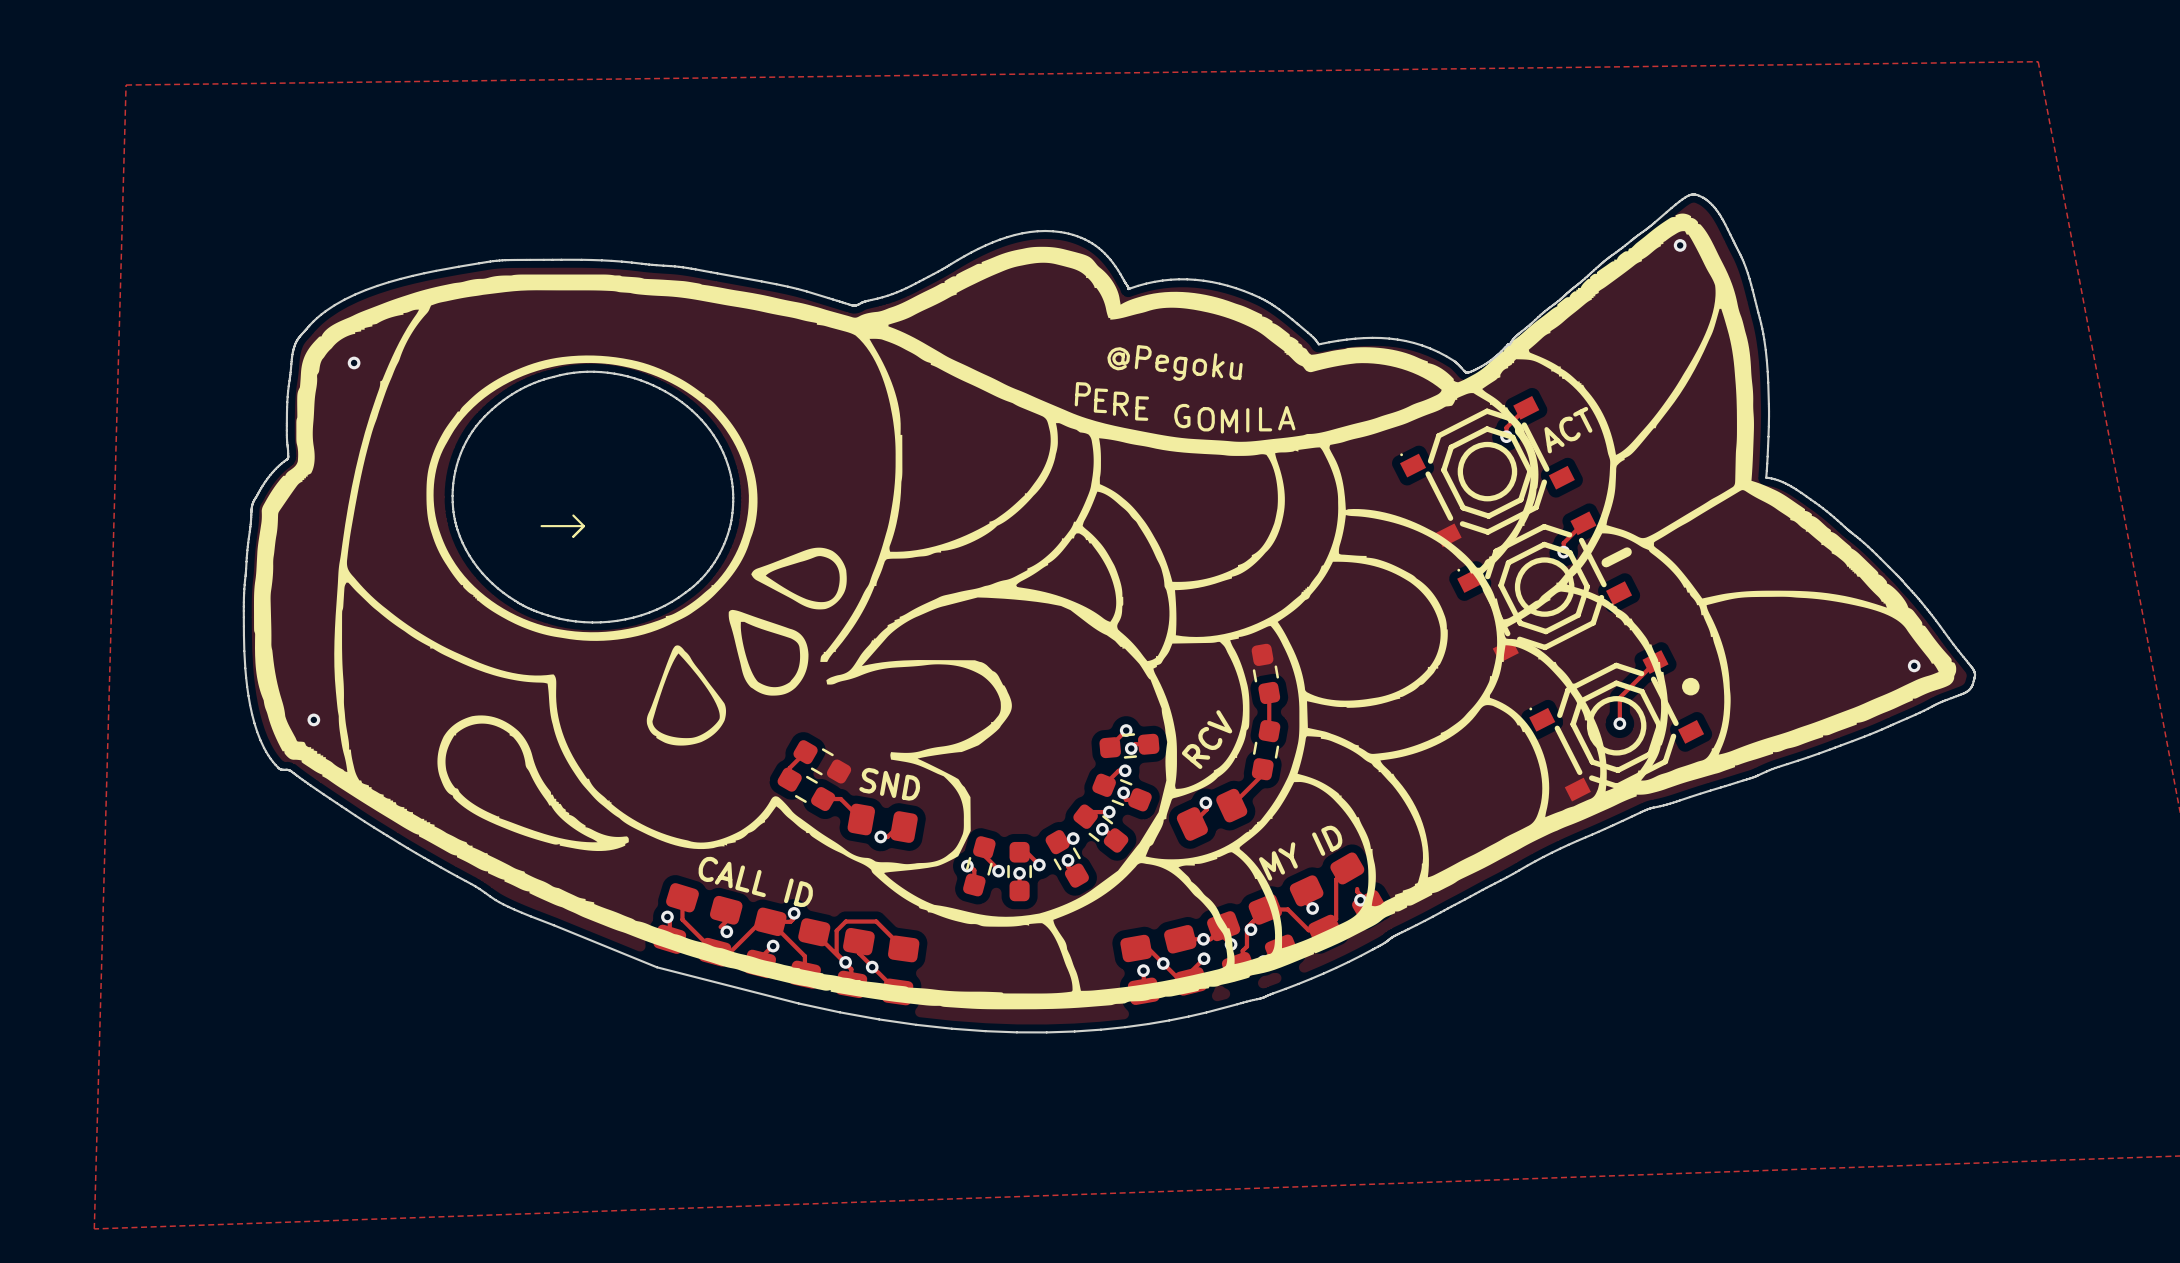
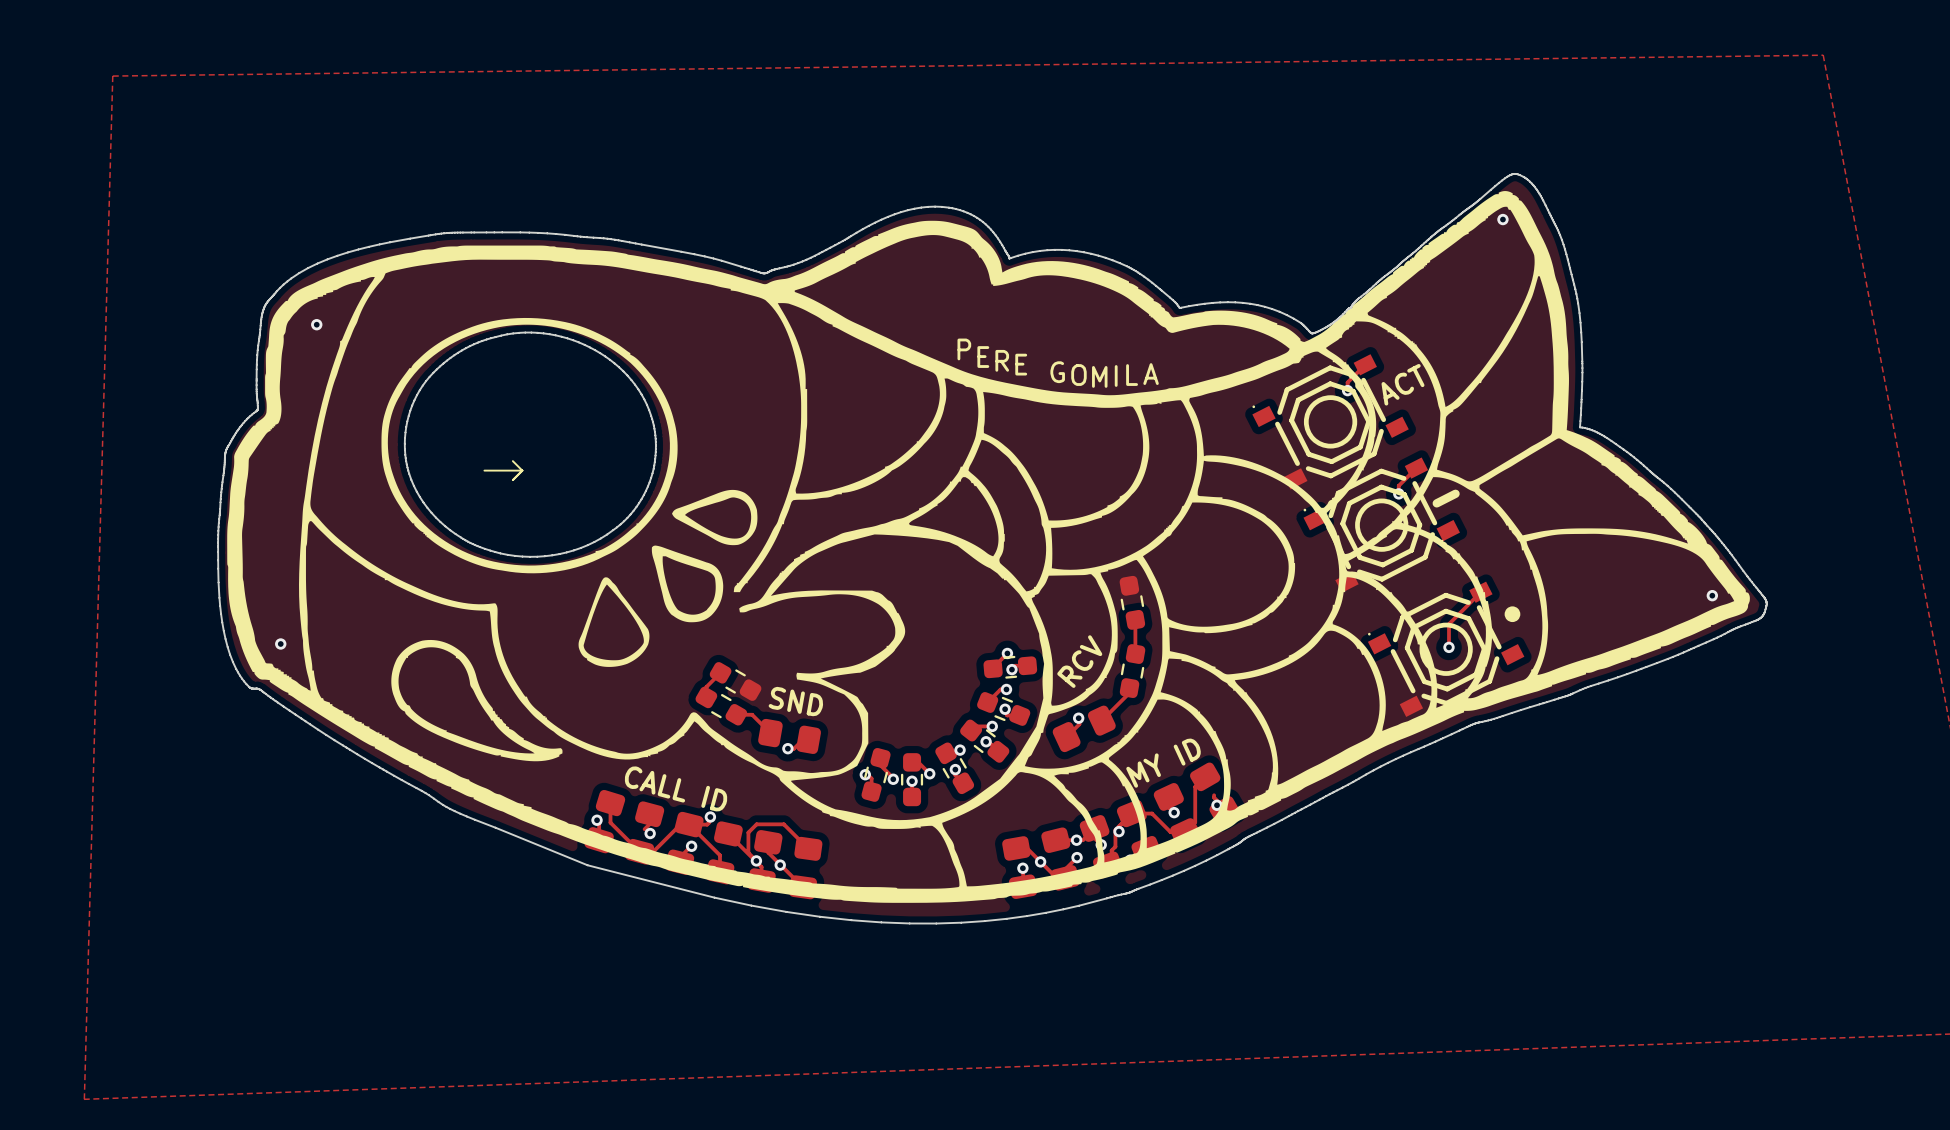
text: @Pegoku (1175, 363) -> none
text rotation: 0° (1082, 394) -> 3.4° counterclockwise (964, 349)
text rotation: 0° (1100, 400) -> 3° counterclockwise (983, 357)
text rotation: 0° (1120, 403) -> 2.5° counterclockwise (1002, 360)
text rotation: 0° (1142, 408) -> 2° counterclockwise (1021, 364)

